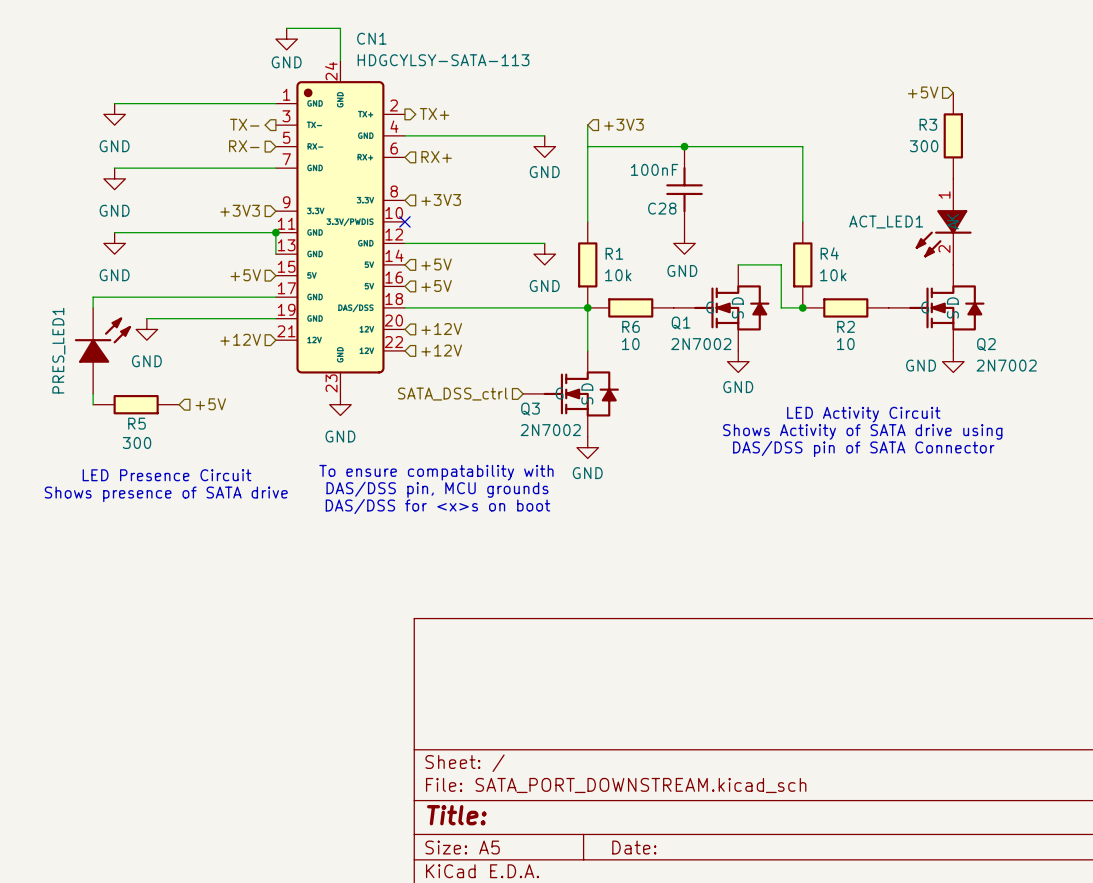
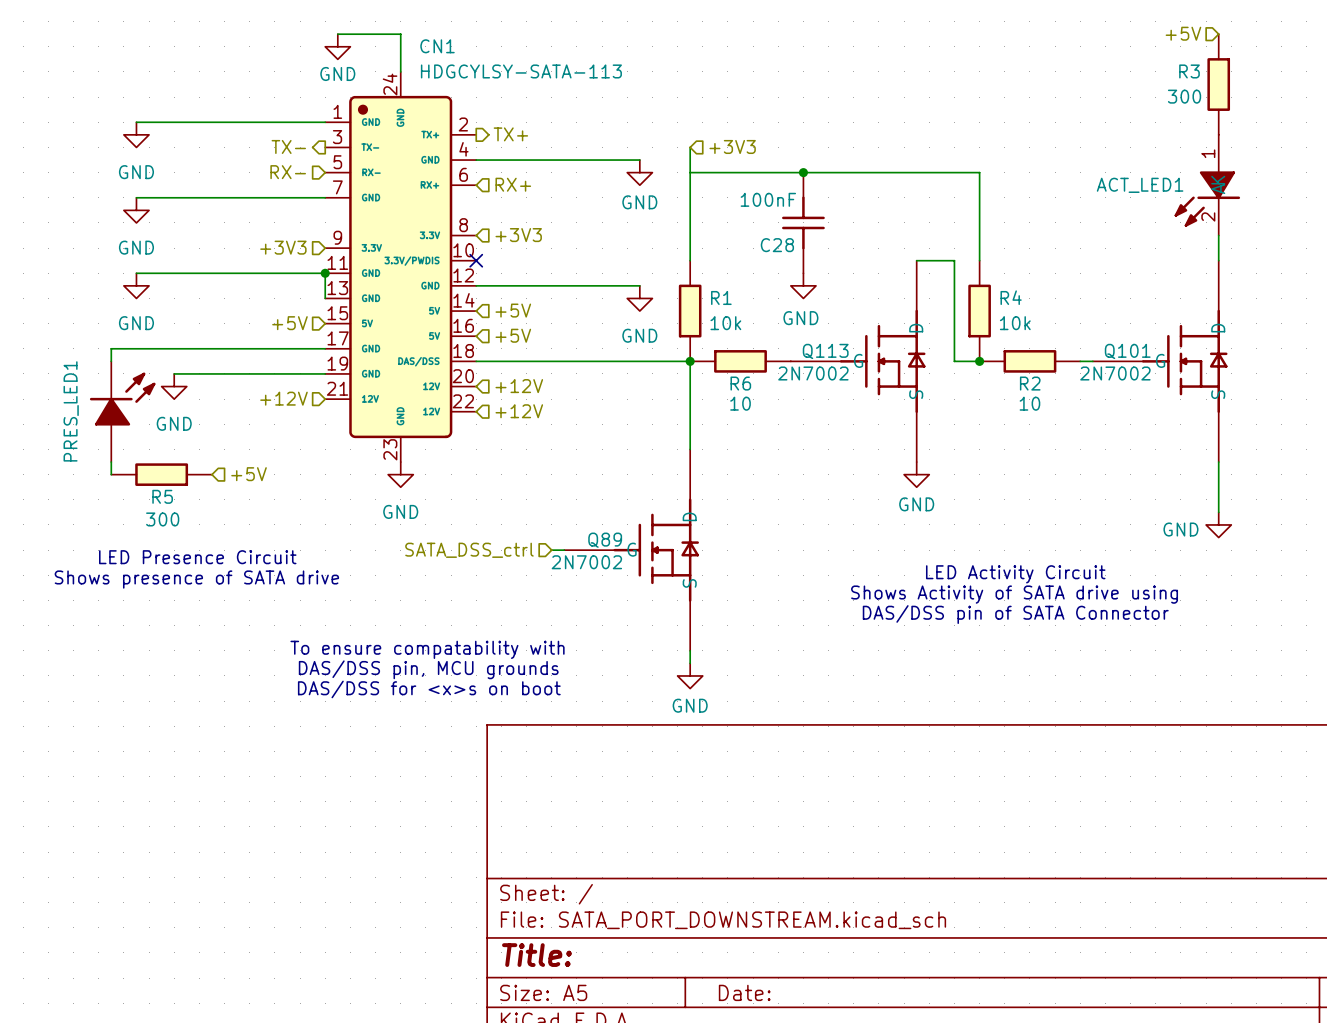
hierarchical label position: +5V (923, 92) -> +5V (1183, 33)
R3 position: (953, 135) -> (1218, 84)
wire: (802, 146) (802, 221) -> (941, 172) (979, 172) (979, 260)
wire: none -> (1218, 235) (1218, 260)
wire: none -> (916, 260) (954, 260) (954, 361) (979, 361)
ACT_LED1 position: (943, 221) -> (1207, 185)
wire: (738, 264) (781, 264) (781, 307) (802, 307) -> none
R4 position: (802, 264) -> (979, 311)
Q1: 2N7002 (721, 307) -> none
Q113: none -> 2N7002 (858, 361)
junction position: (802, 307) -> (979, 361)
R2 position: (845, 307) -> (1029, 361)
Q2: 2N7002 (936, 307) -> none
Q101: none -> 2N7002 (1160, 361)
power symbol position: GND (738, 361) -> GND (916, 474)
power symbol: GND (953, 361) -> none
Q3: 2N7002 (571, 393) -> none
wire: none -> (1218, 462) (1218, 512)
hierarchical label position: SATA_DSS_ctrl (452, 394) -> SATA_DSS_ctrl (469, 550)
text position: LED Activity Circuit (863, 414) -> LED Activity Circuit (1015, 574)
text position: Shows Activity of SATA drive using (862, 431) -> Shows Activity of SATA drive using (1014, 594)
power symbol: GND (587, 447) -> none
power symbol: none -> GND (1218, 524)
text position: DAS/DSS pin of SATA Connector (863, 448) -> DAS/DSS pin of SATA Connector (1015, 614)
Q89: none -> 2N7002 (631, 550)
text position: To ensure compatability with (436, 472) -> To ensure compatability with (427, 649)
text position: DAS/DSS pin, MCU grounds (437, 489) -> DAS/DSS pin, MCU grounds (428, 669)
text position: DAS/DSS for <x>s on boot (437, 506) -> DAS/DSS for <x>s on boot (429, 689)
wire: none -> (690, 650) (690, 663)
power symbol: none -> GND (690, 675)

